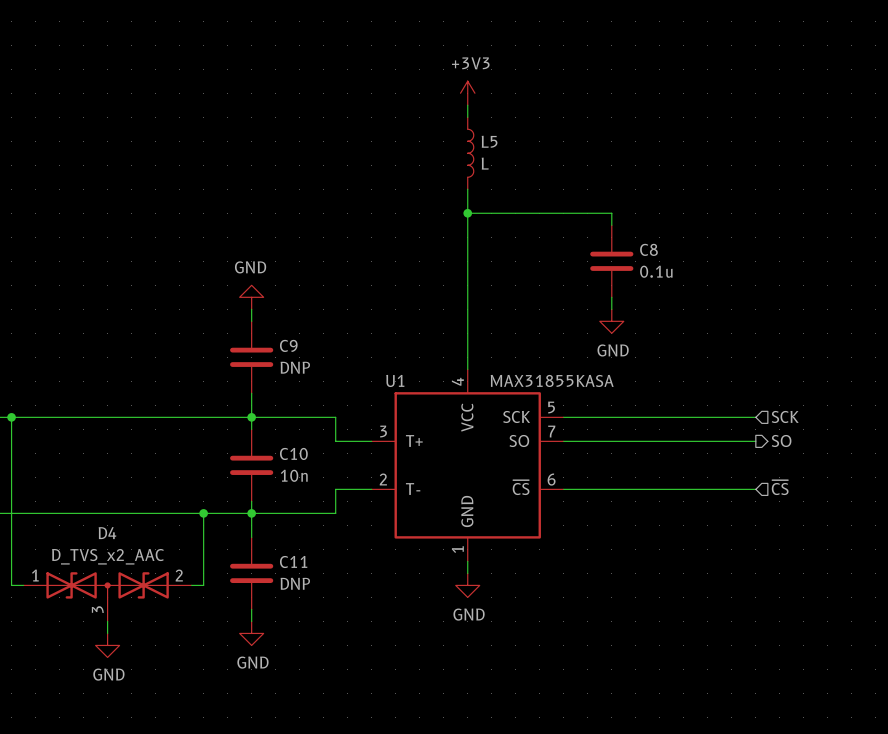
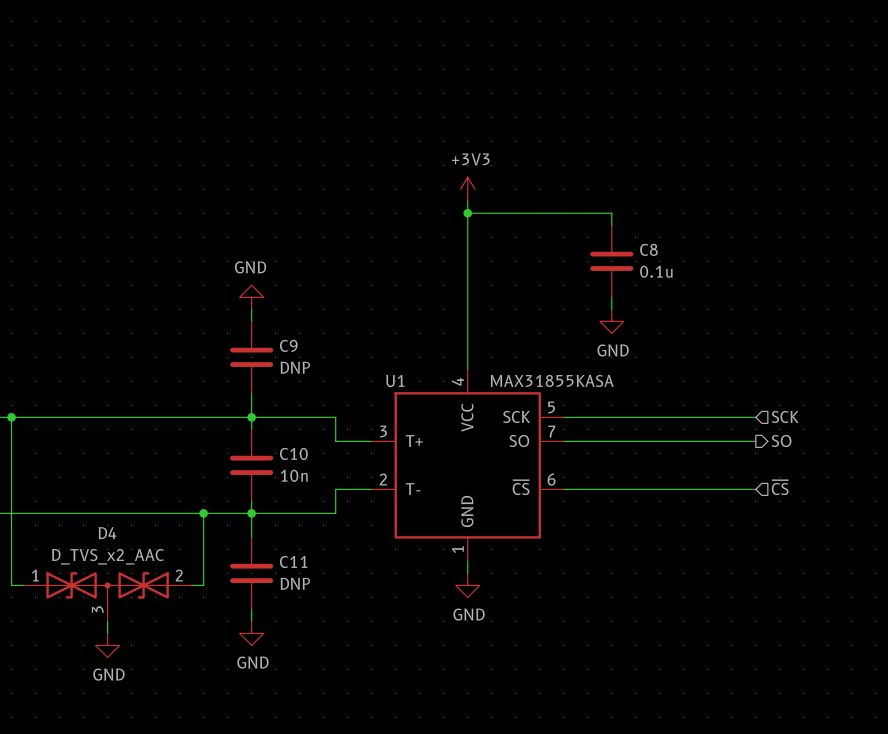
power symbol position: +3V3 (467, 93) -> +3V3 (467, 189)
wire: (467, 105) (467, 117) -> none
L5: L (470, 153) -> none

